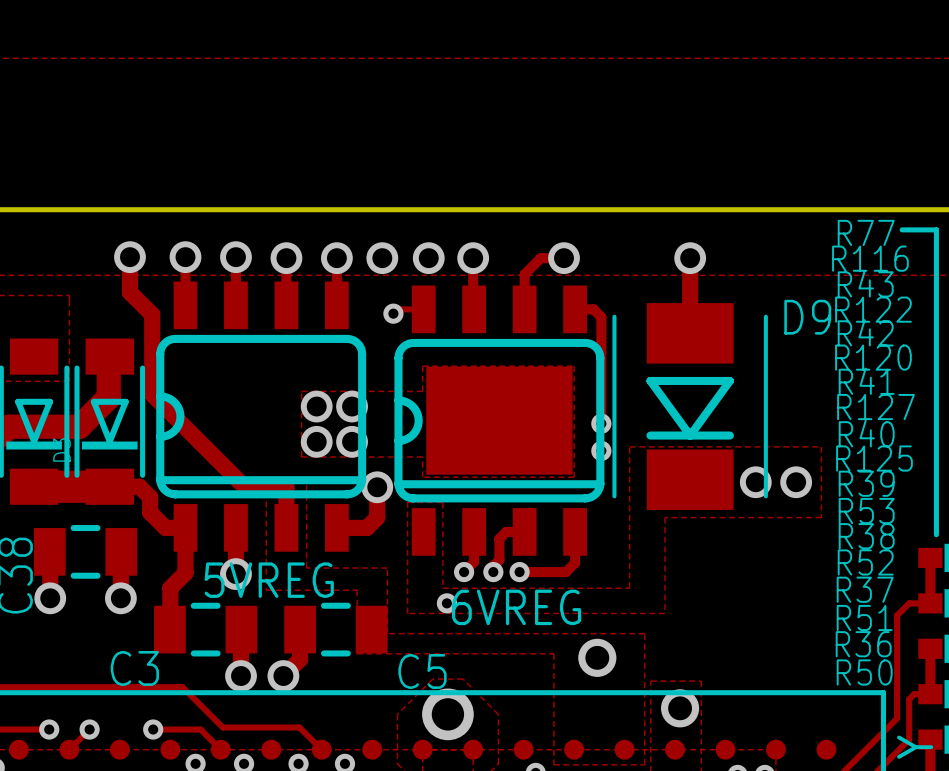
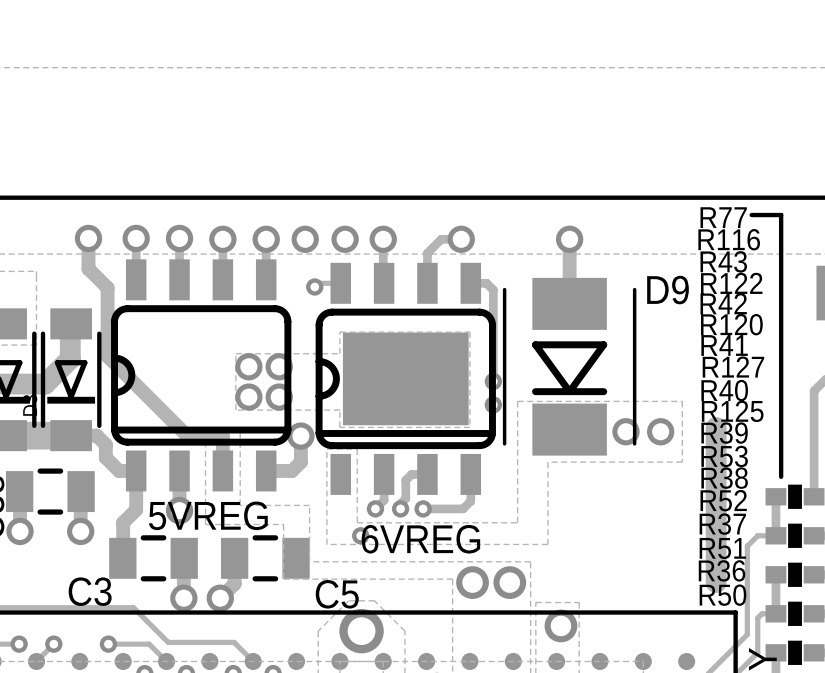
track: none -> (716, 427) (716, 582)
via: none -> (472, 582)
via: (597, 657) -> none
via: none -> (509, 582)

